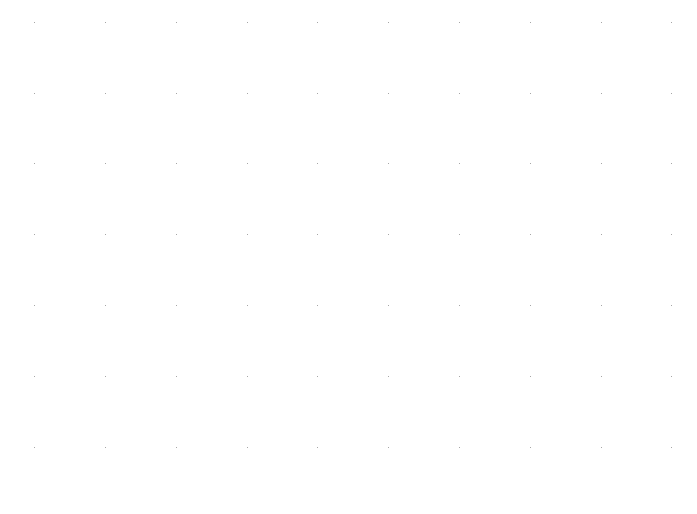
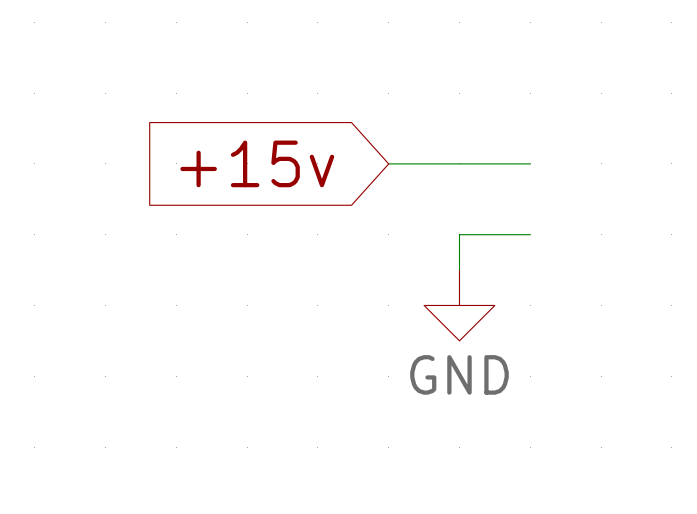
global label: none -> +15v (257, 163)
wire: none -> (388, 163) (530, 163)
wire: none -> (530, 234) (459, 234) (459, 270)
power symbol: none -> GND (459, 305)

